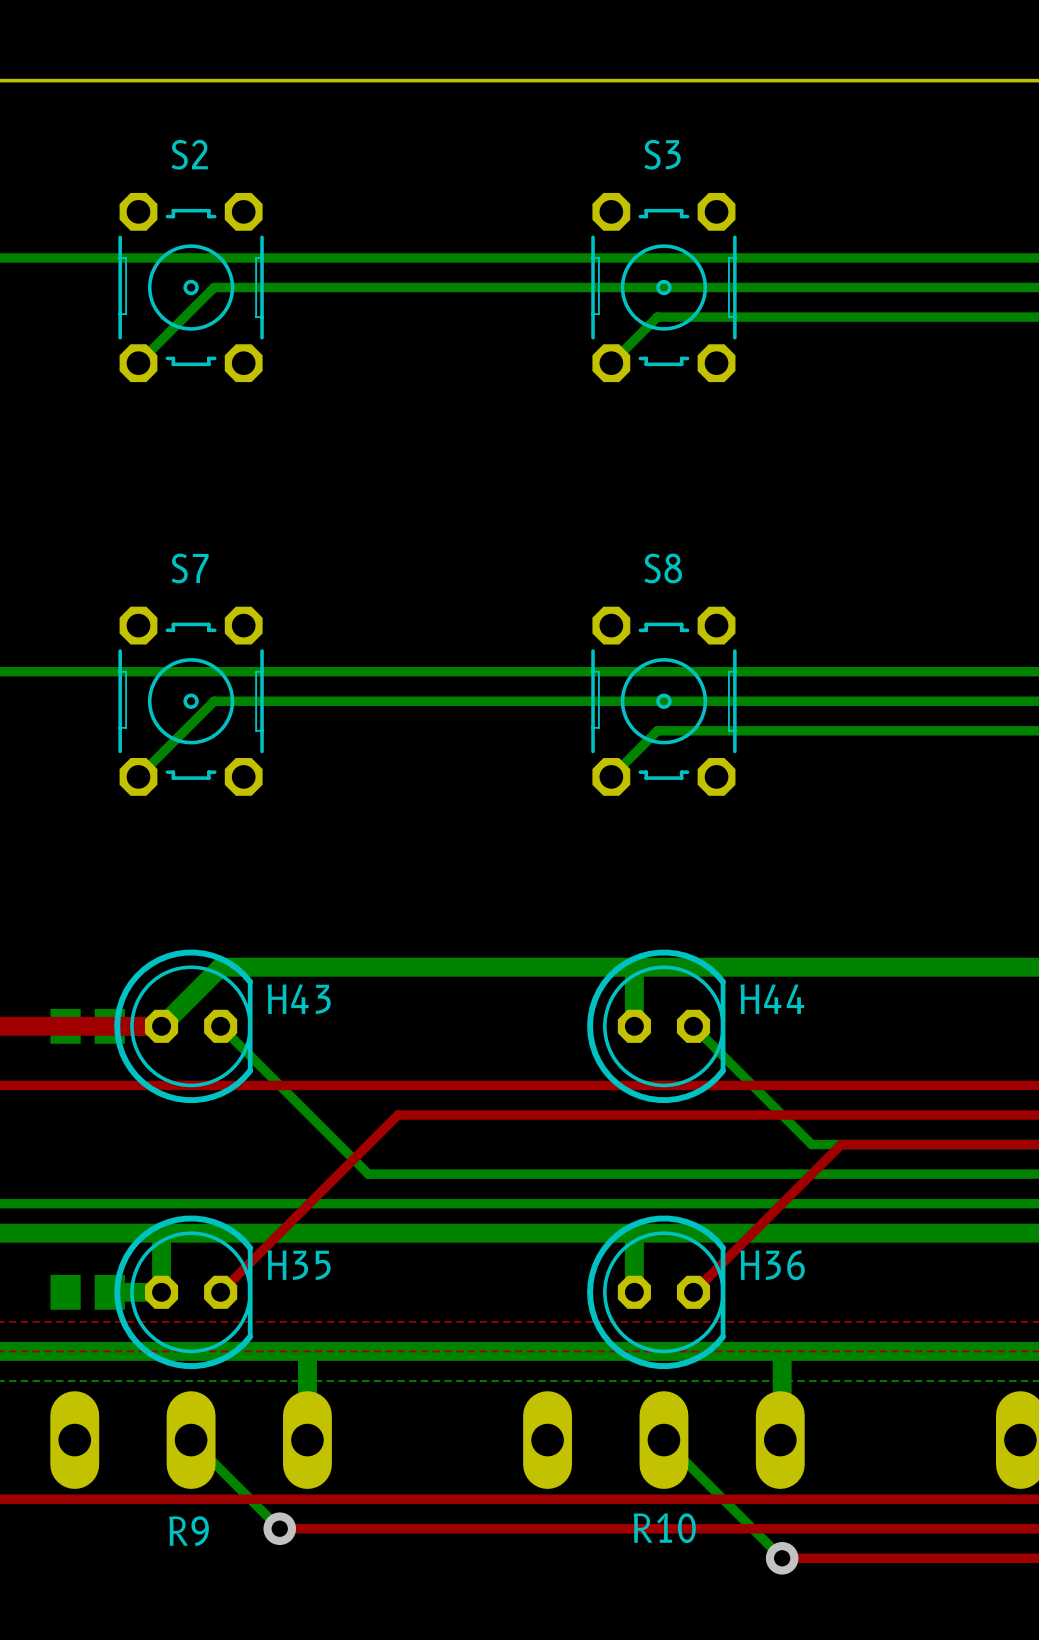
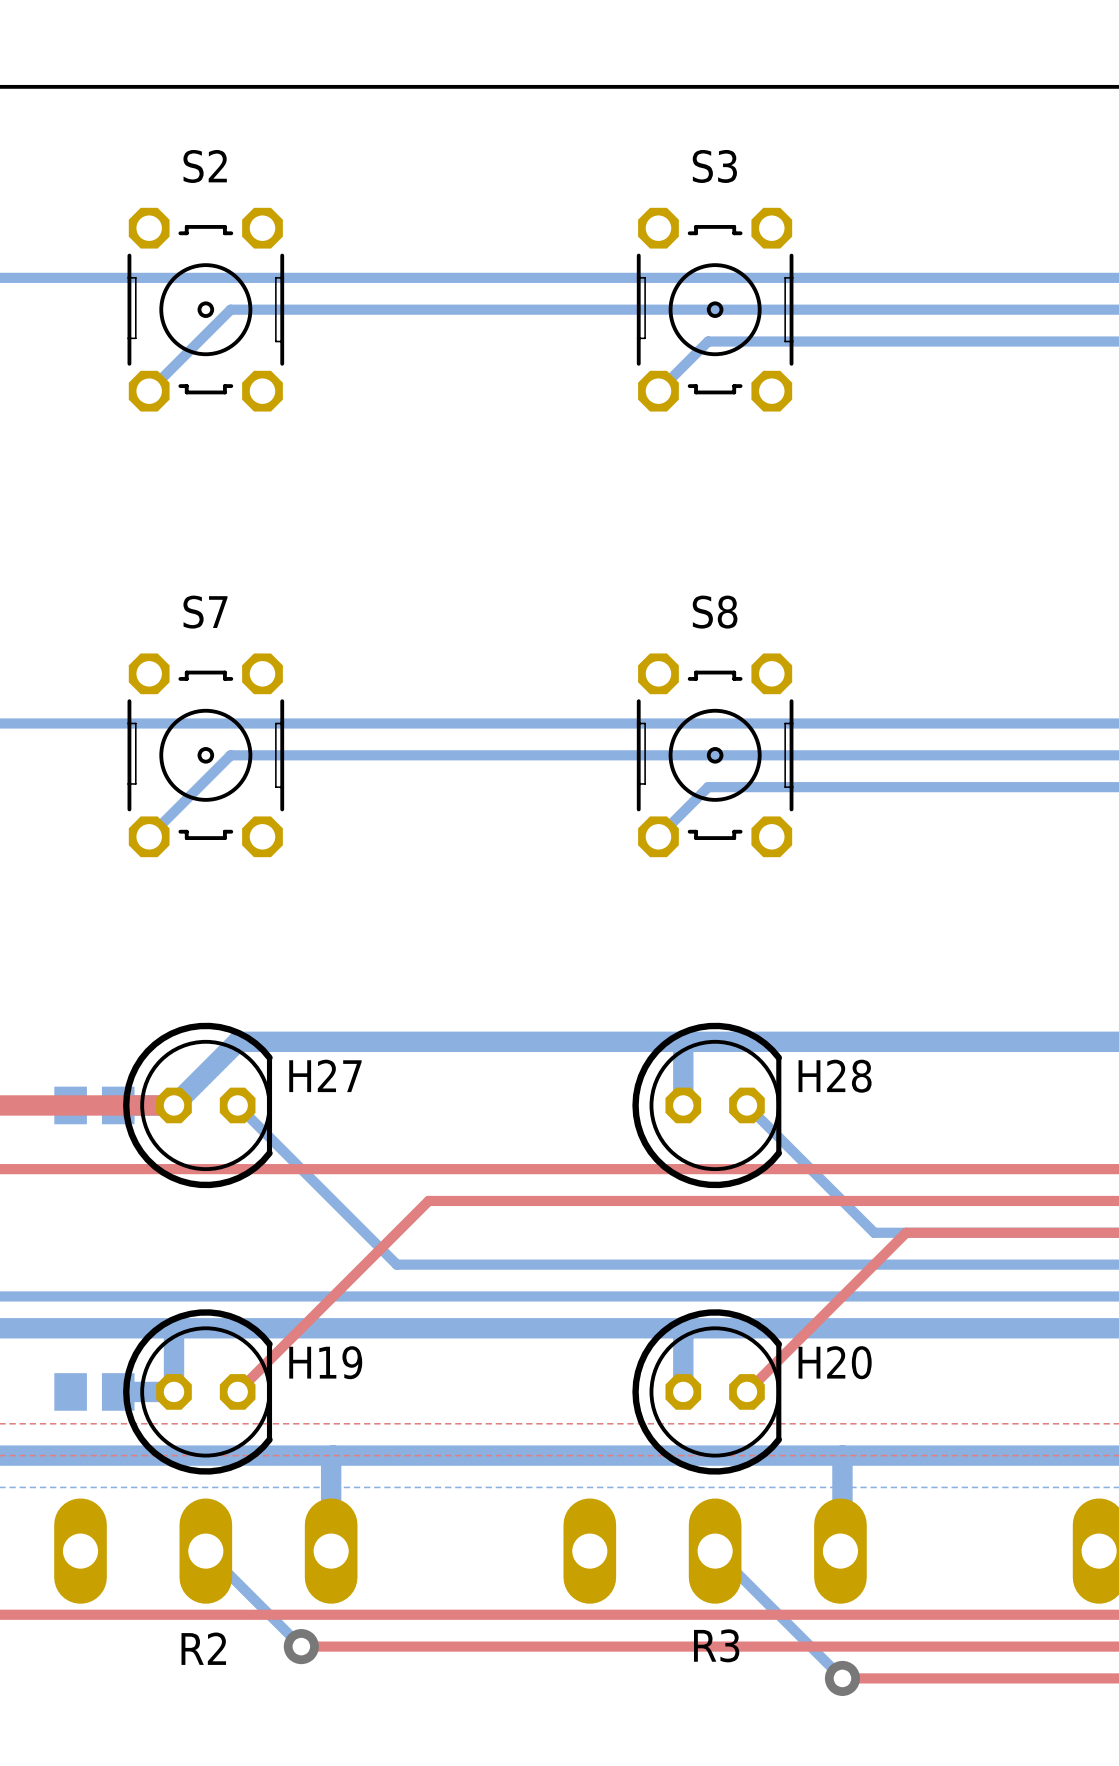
H43 name: H43 (299, 999) -> H27 (325, 1075)
H44 name: H44 (772, 999) -> H28 (835, 1076)
H35 name: H35 (299, 1265) -> H19 (325, 1362)
H36 name: H36 (772, 1265) -> H20 (835, 1362)
R10 name: R10 (664, 1528) -> R3 (716, 1645)
R9 name: R9 (189, 1531) -> R2 (203, 1648)

